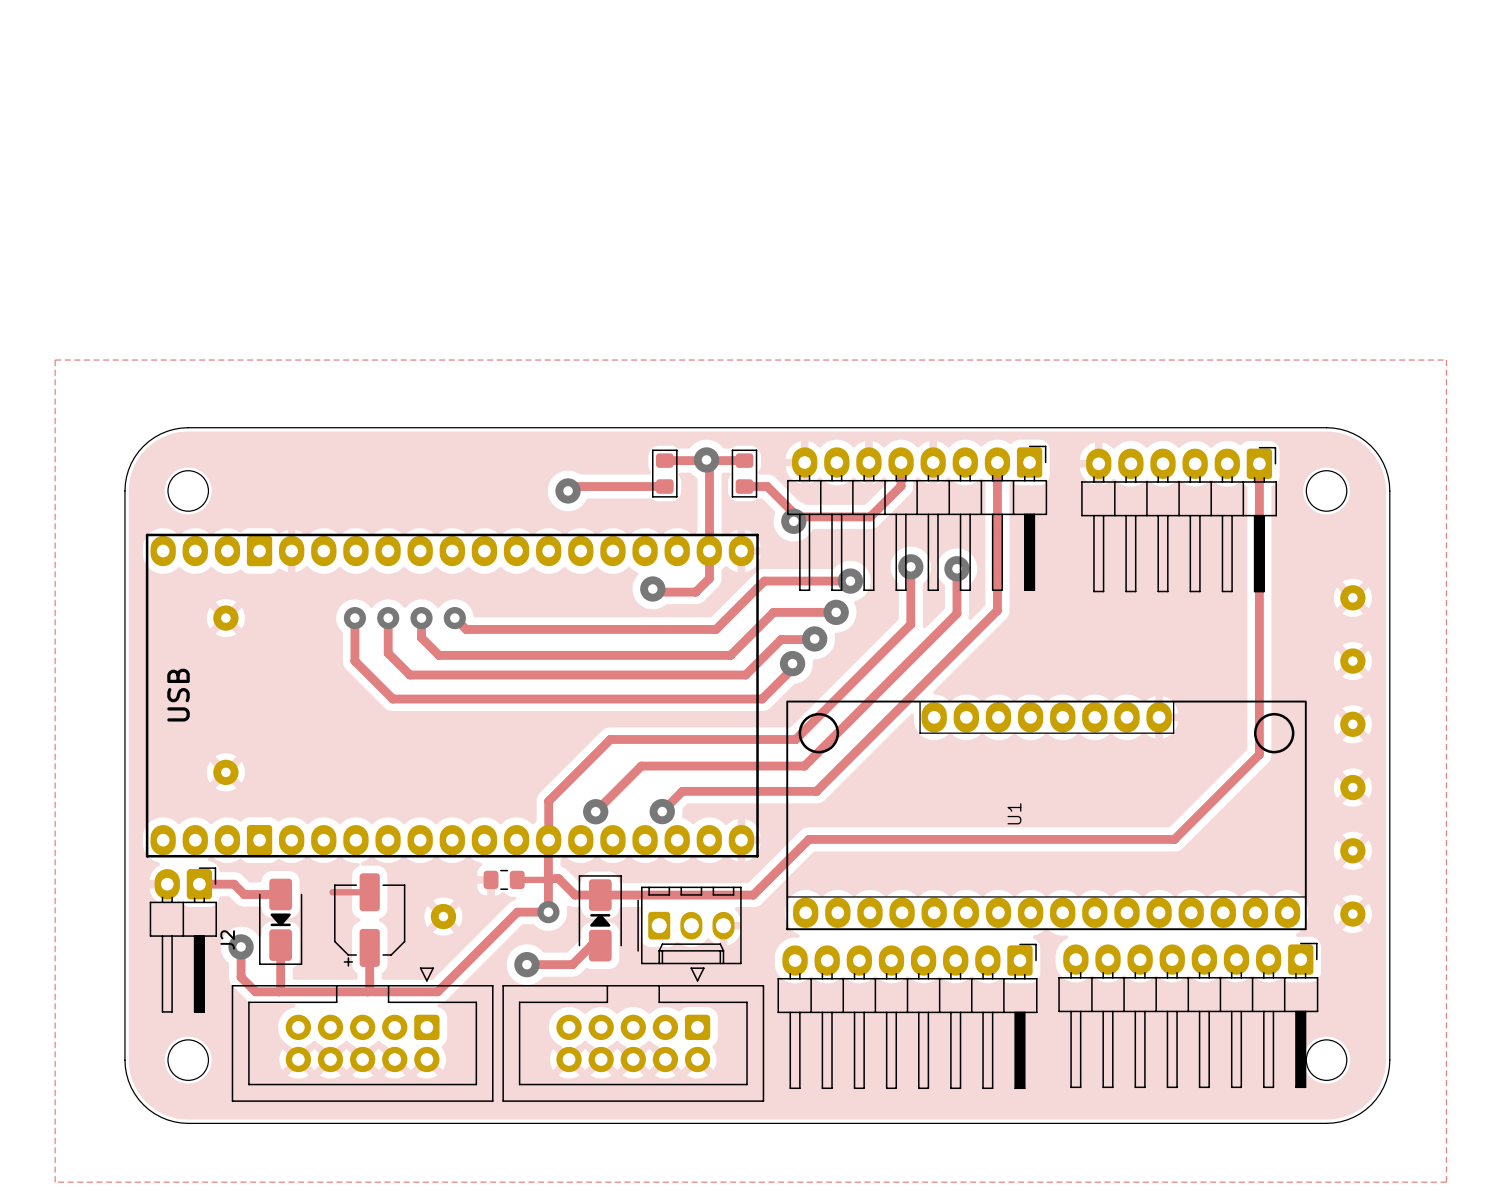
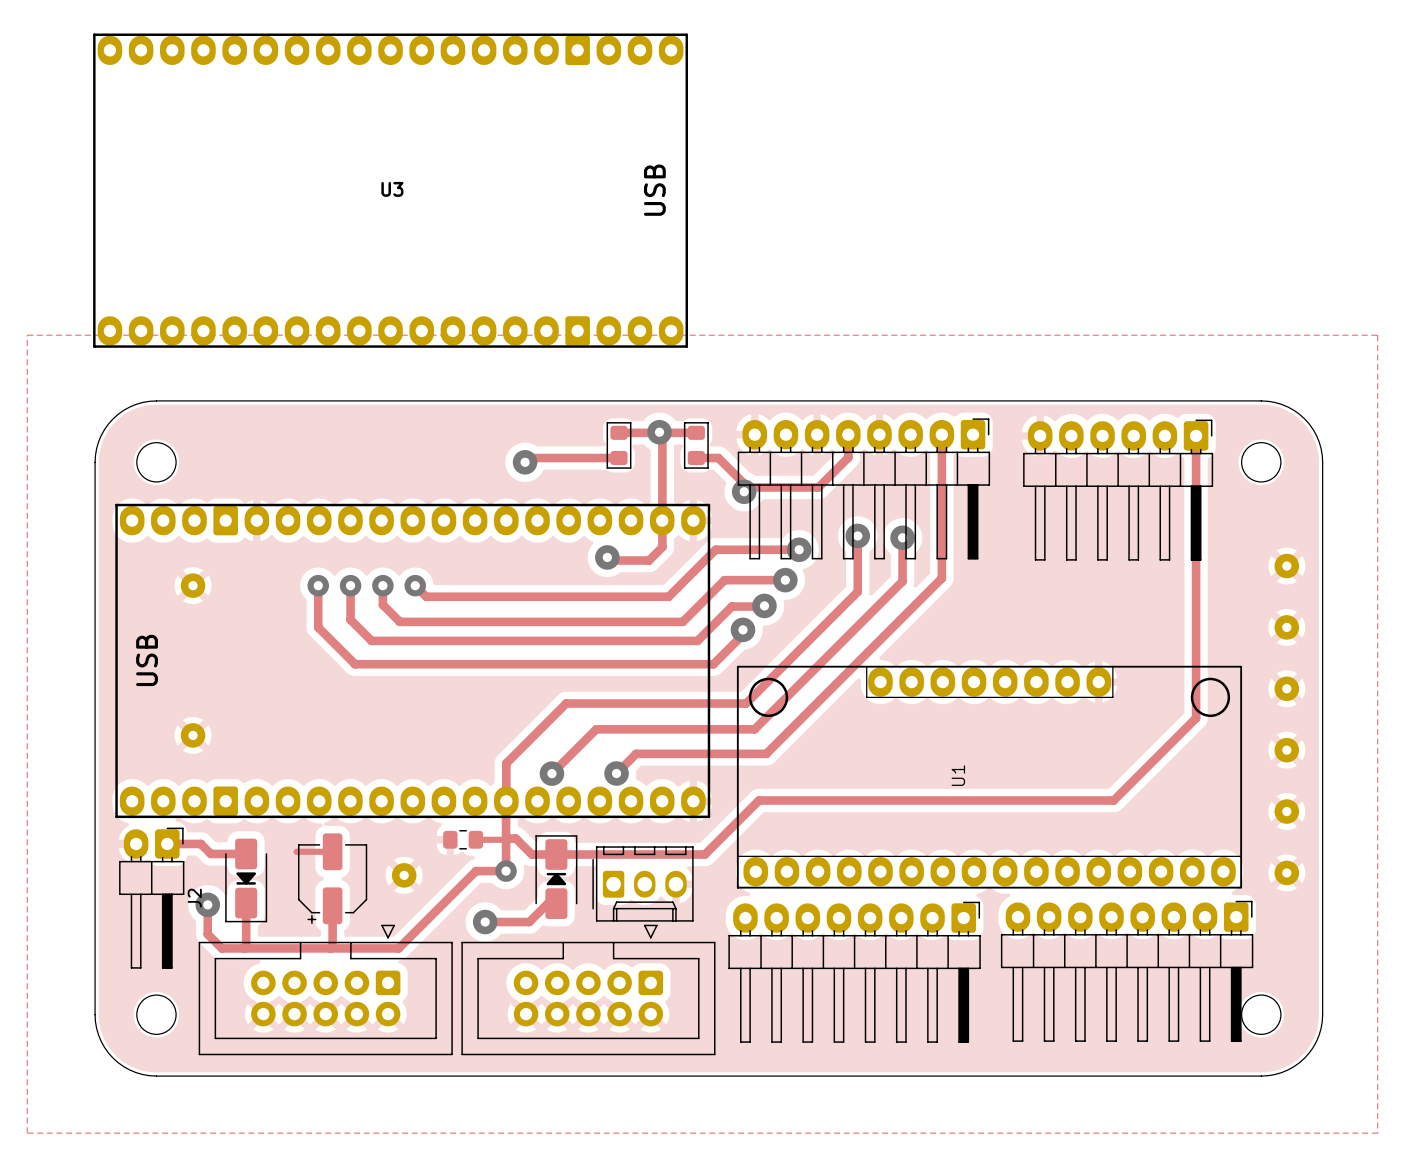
U3: none -> (390, 190)

